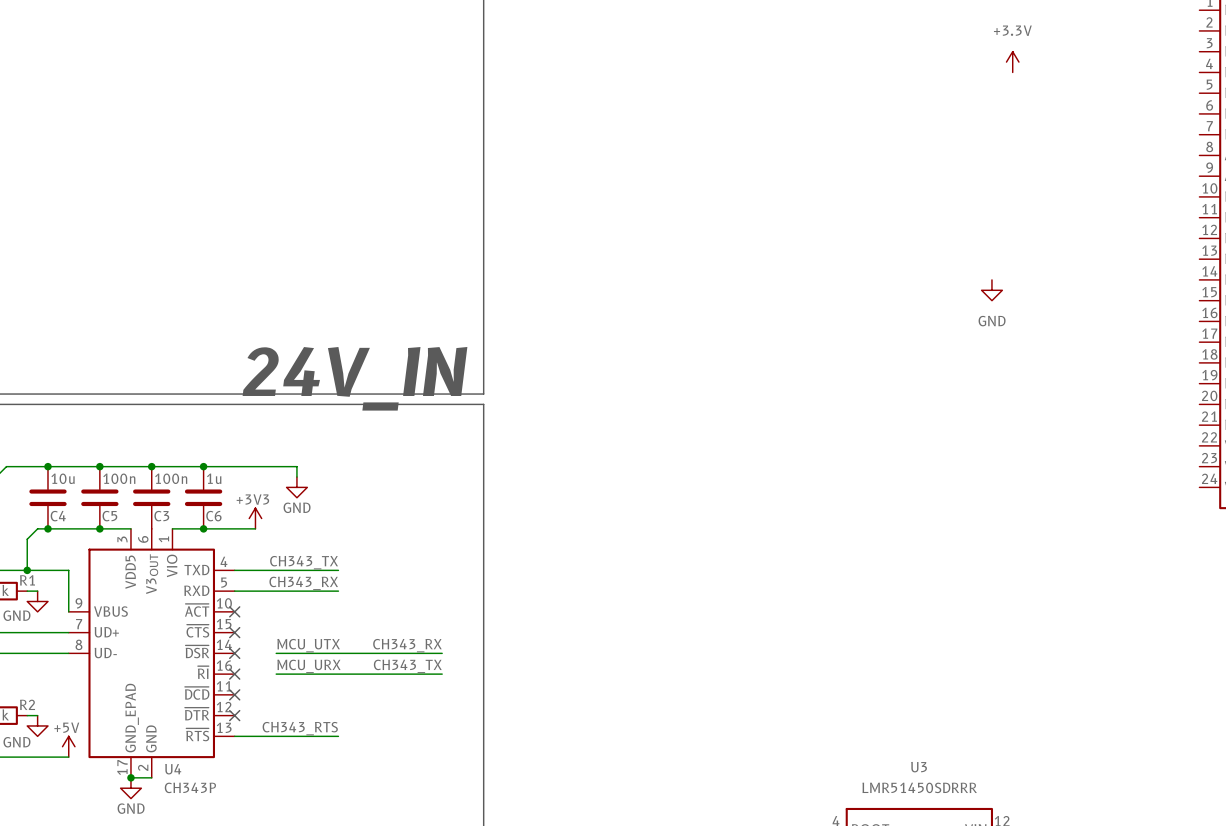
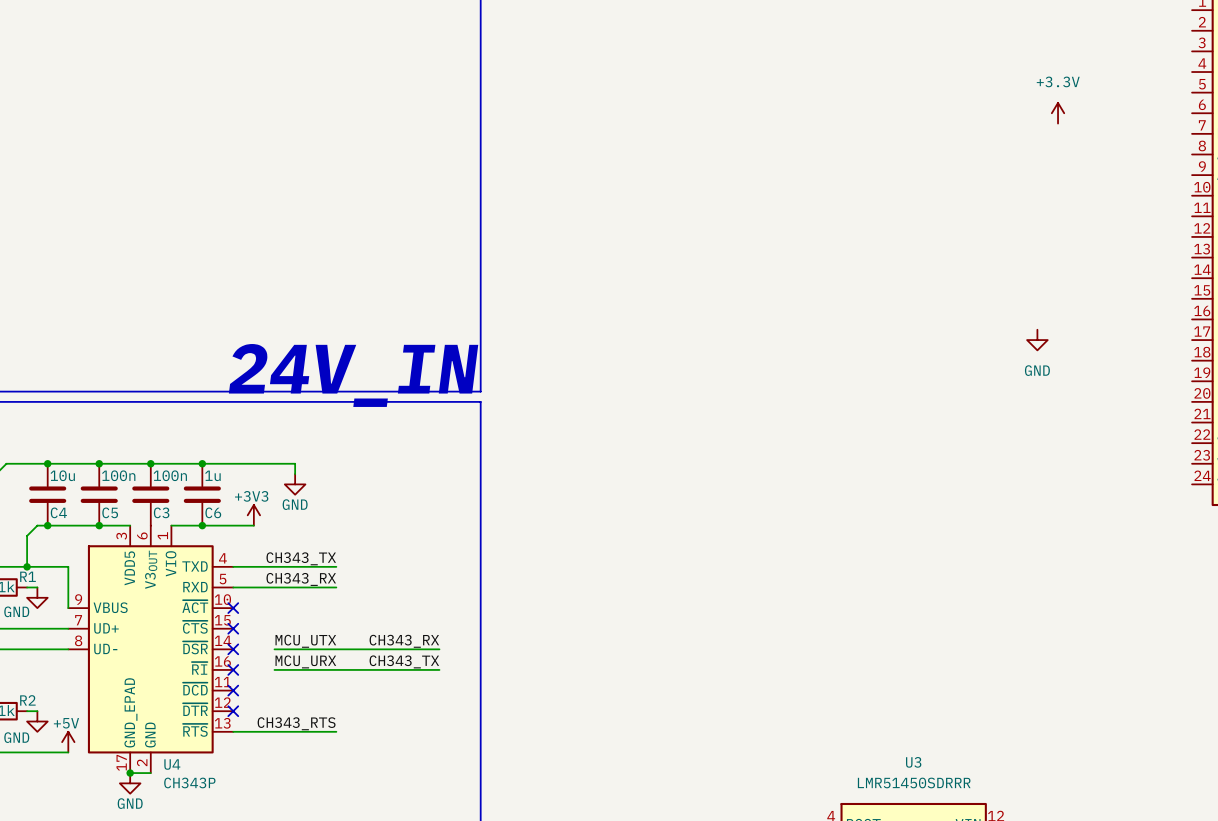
power symbol position: +3.3V (1012, 62) -> +3.3V (1058, 113)
power symbol position: GND (991, 290) -> GND (1037, 340)

